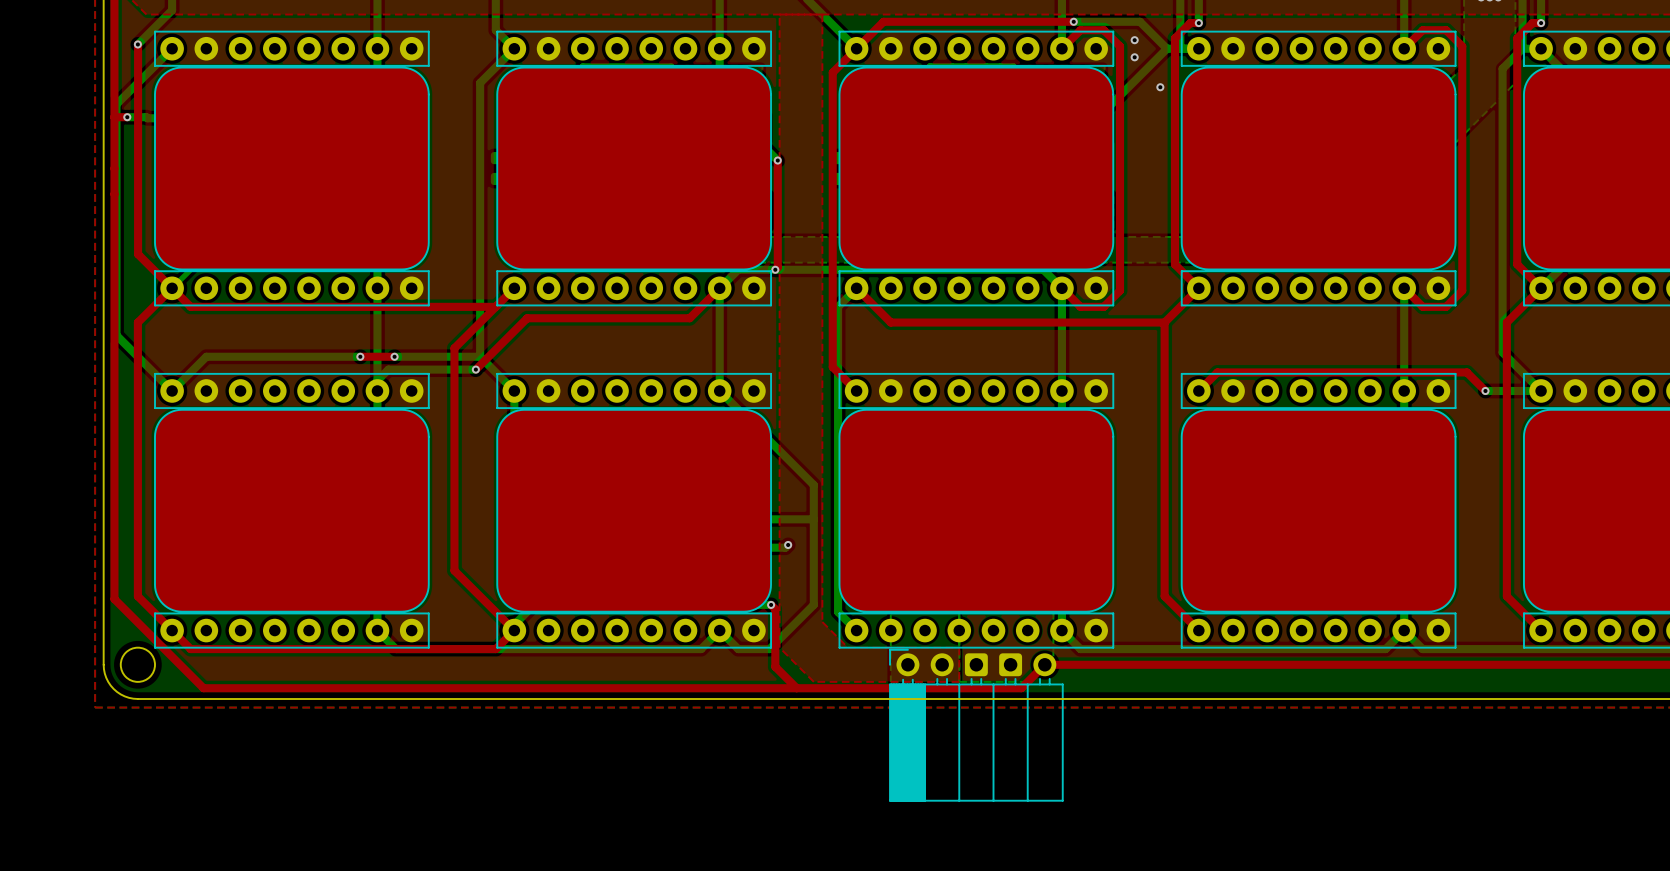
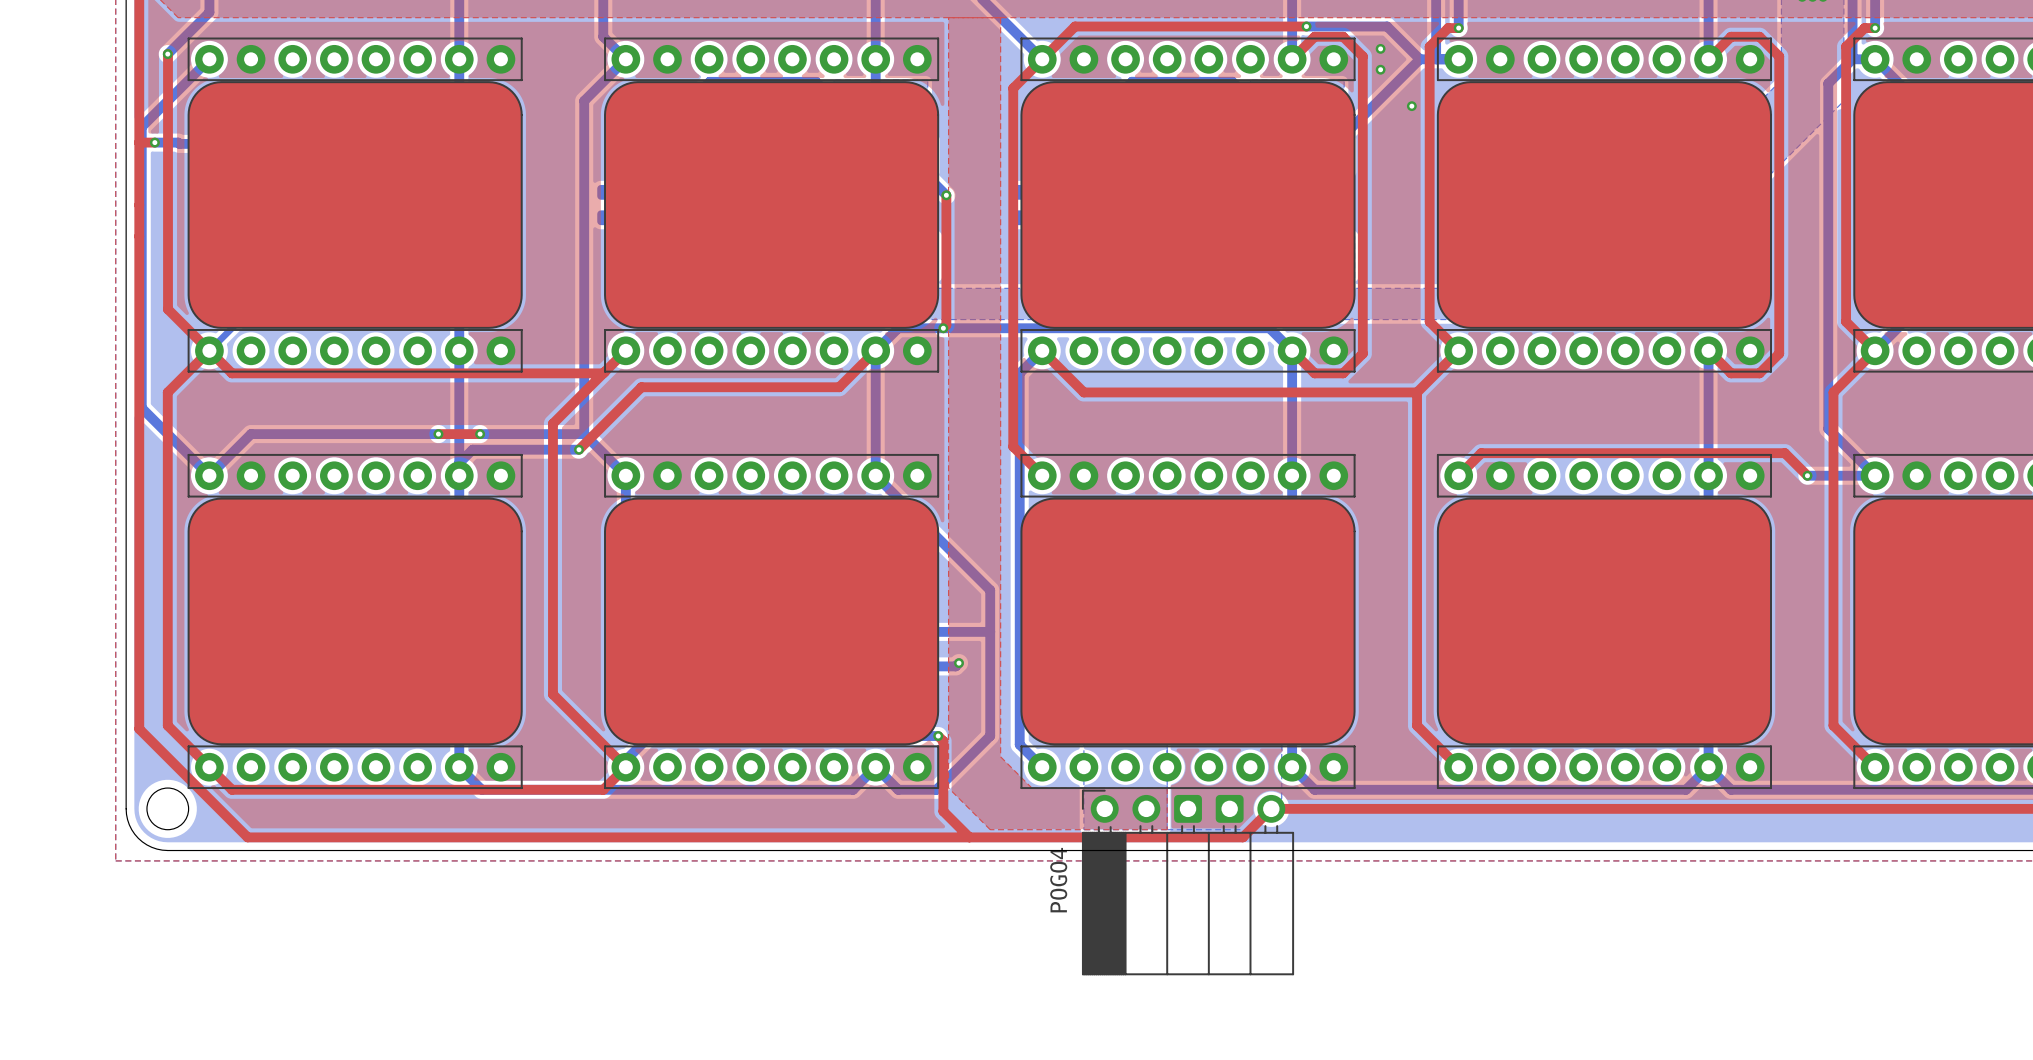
POGO4 name: none -> POGO4 (1058, 880)

